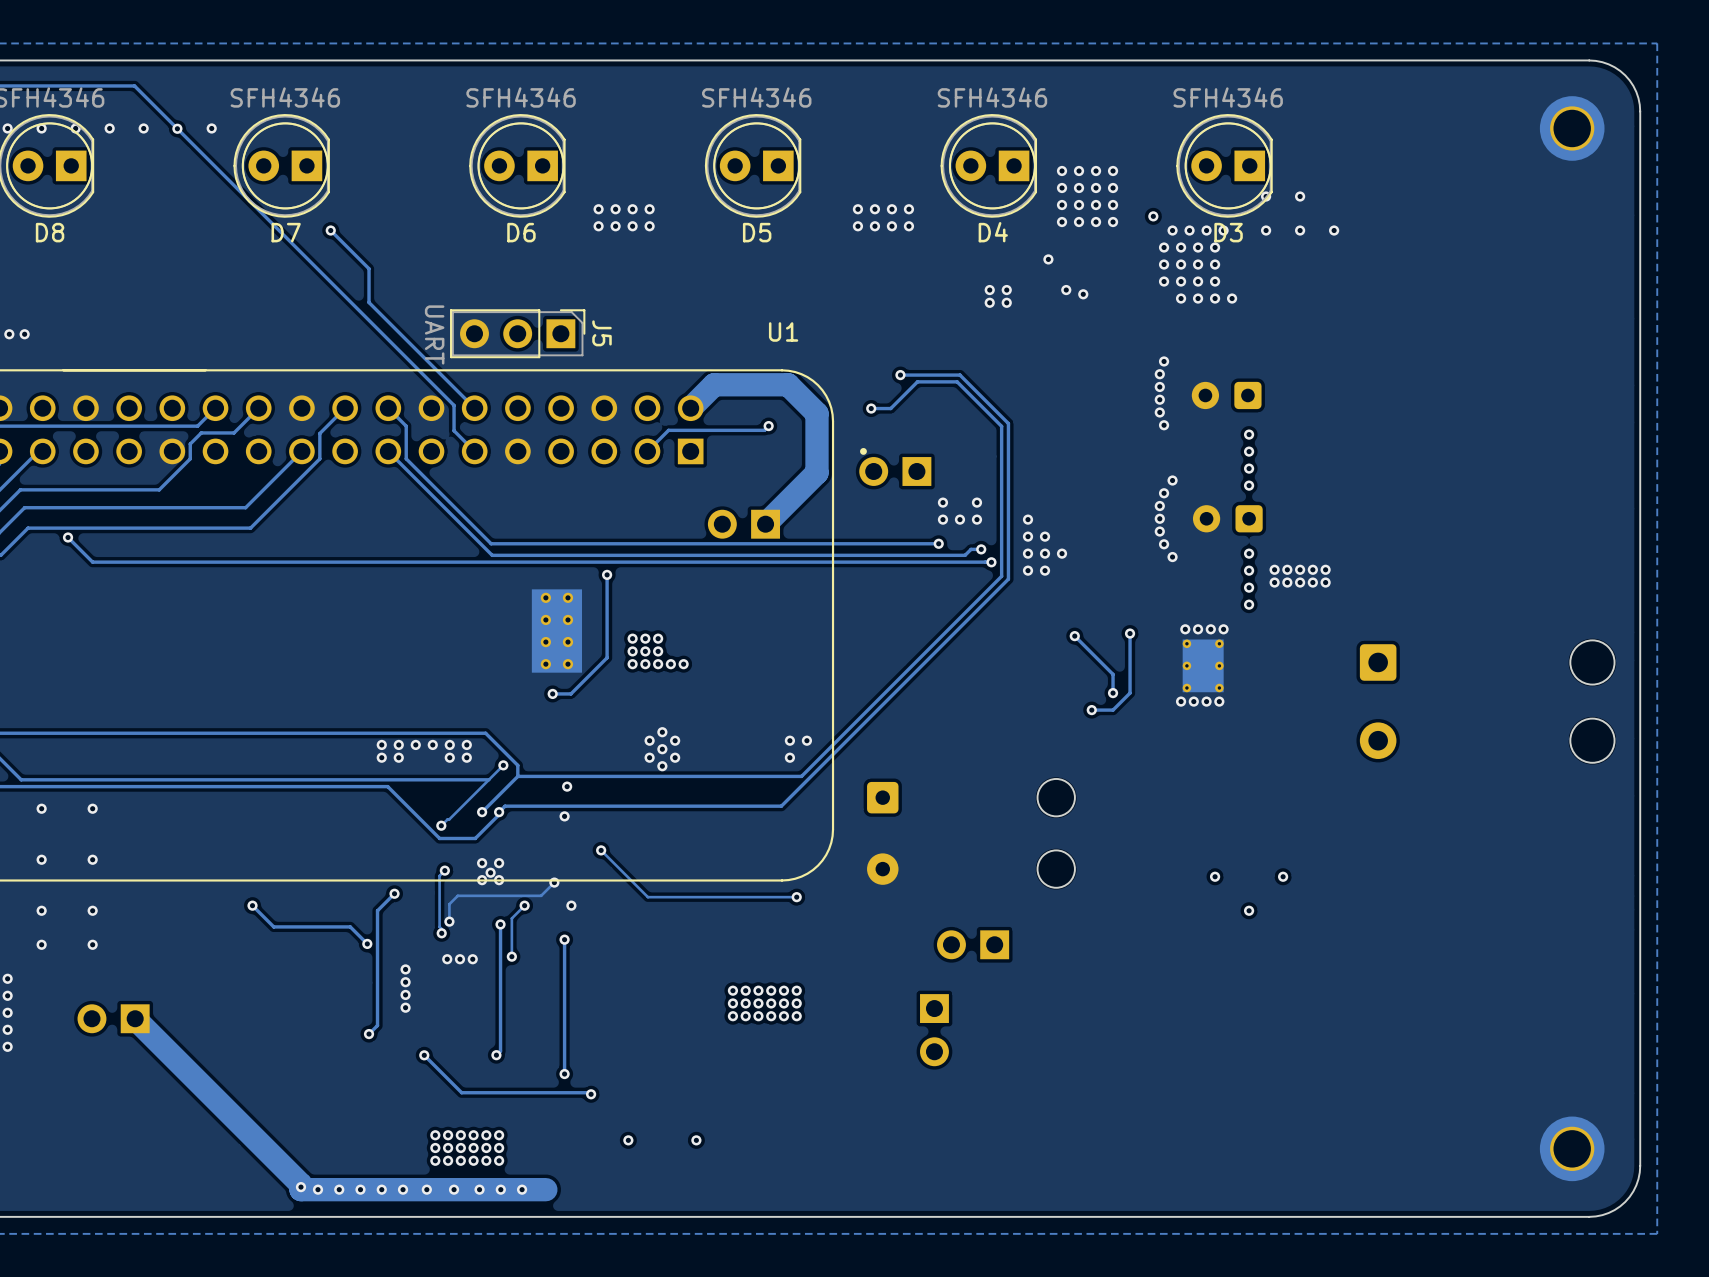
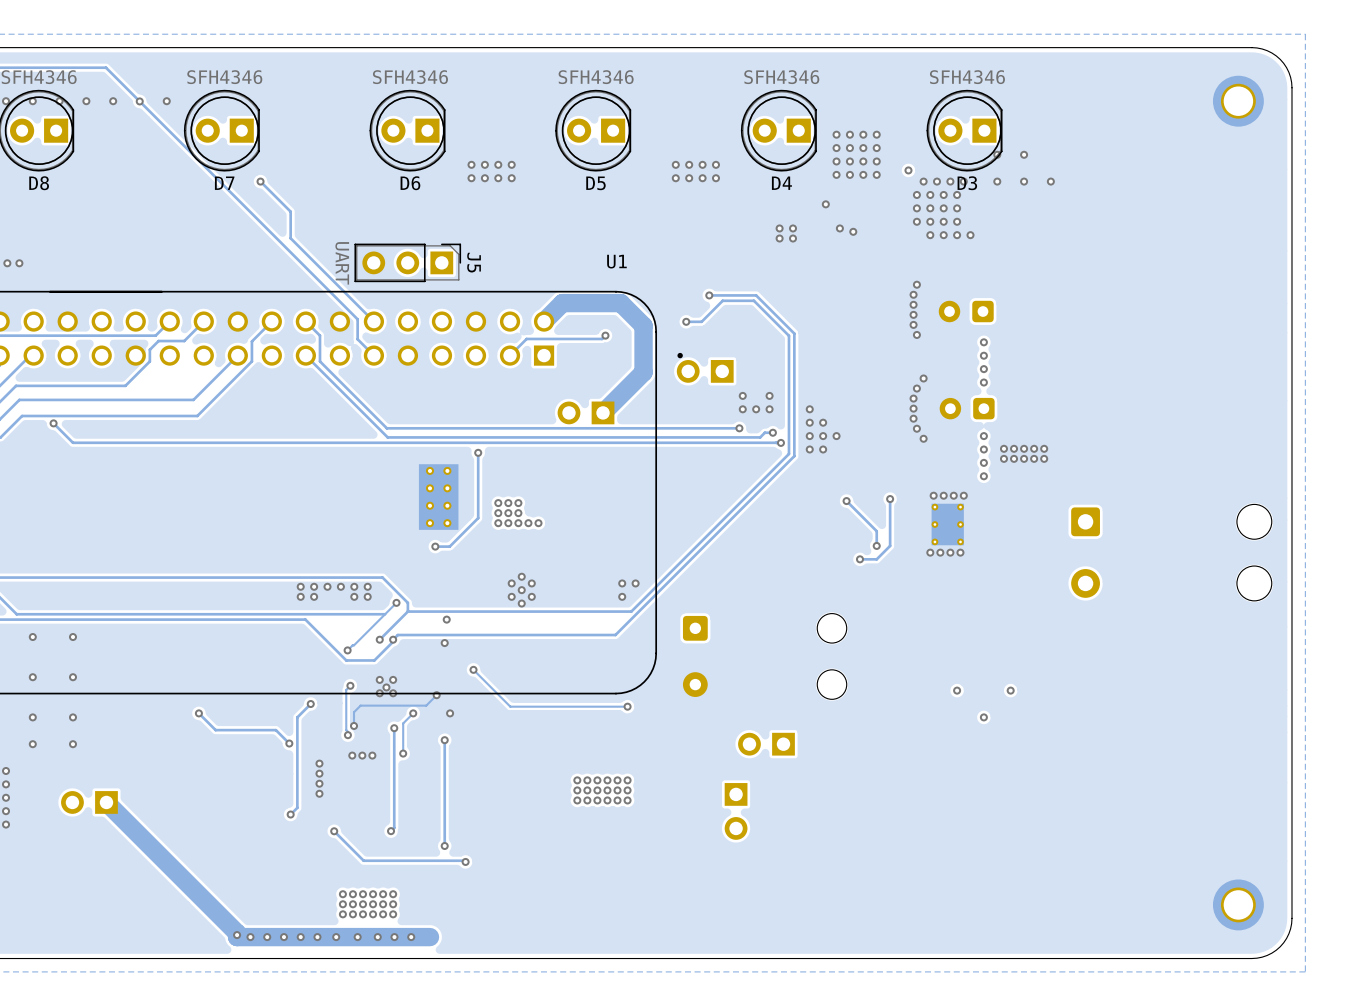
via: (628, 1140) -> none
via: (696, 1140) -> none

